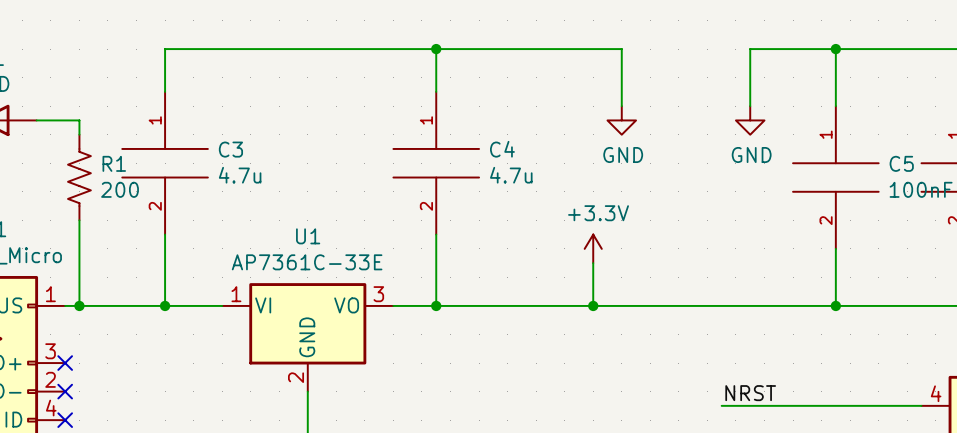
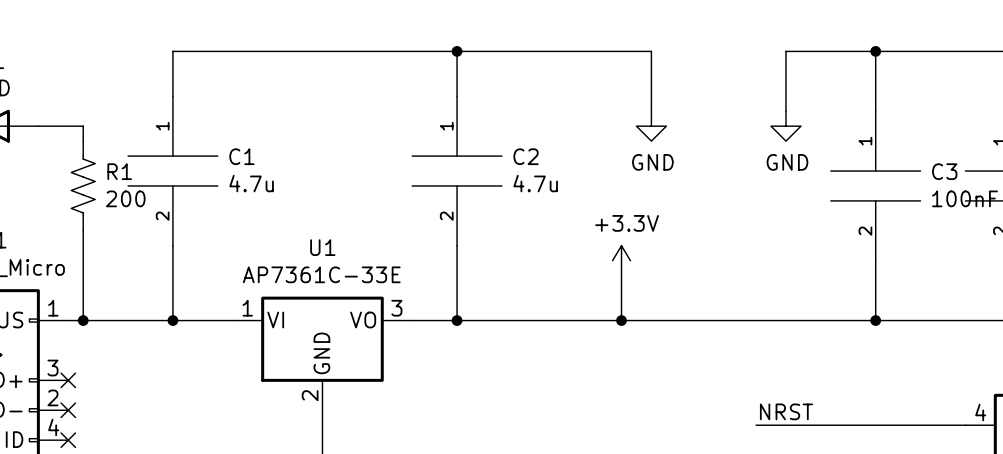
C3 name: C3 (230, 149) -> C1 (241, 156)
C4 name: C4 (502, 149) -> C2 (526, 156)
C5 name: C5 (901, 163) -> C3 (944, 171)

